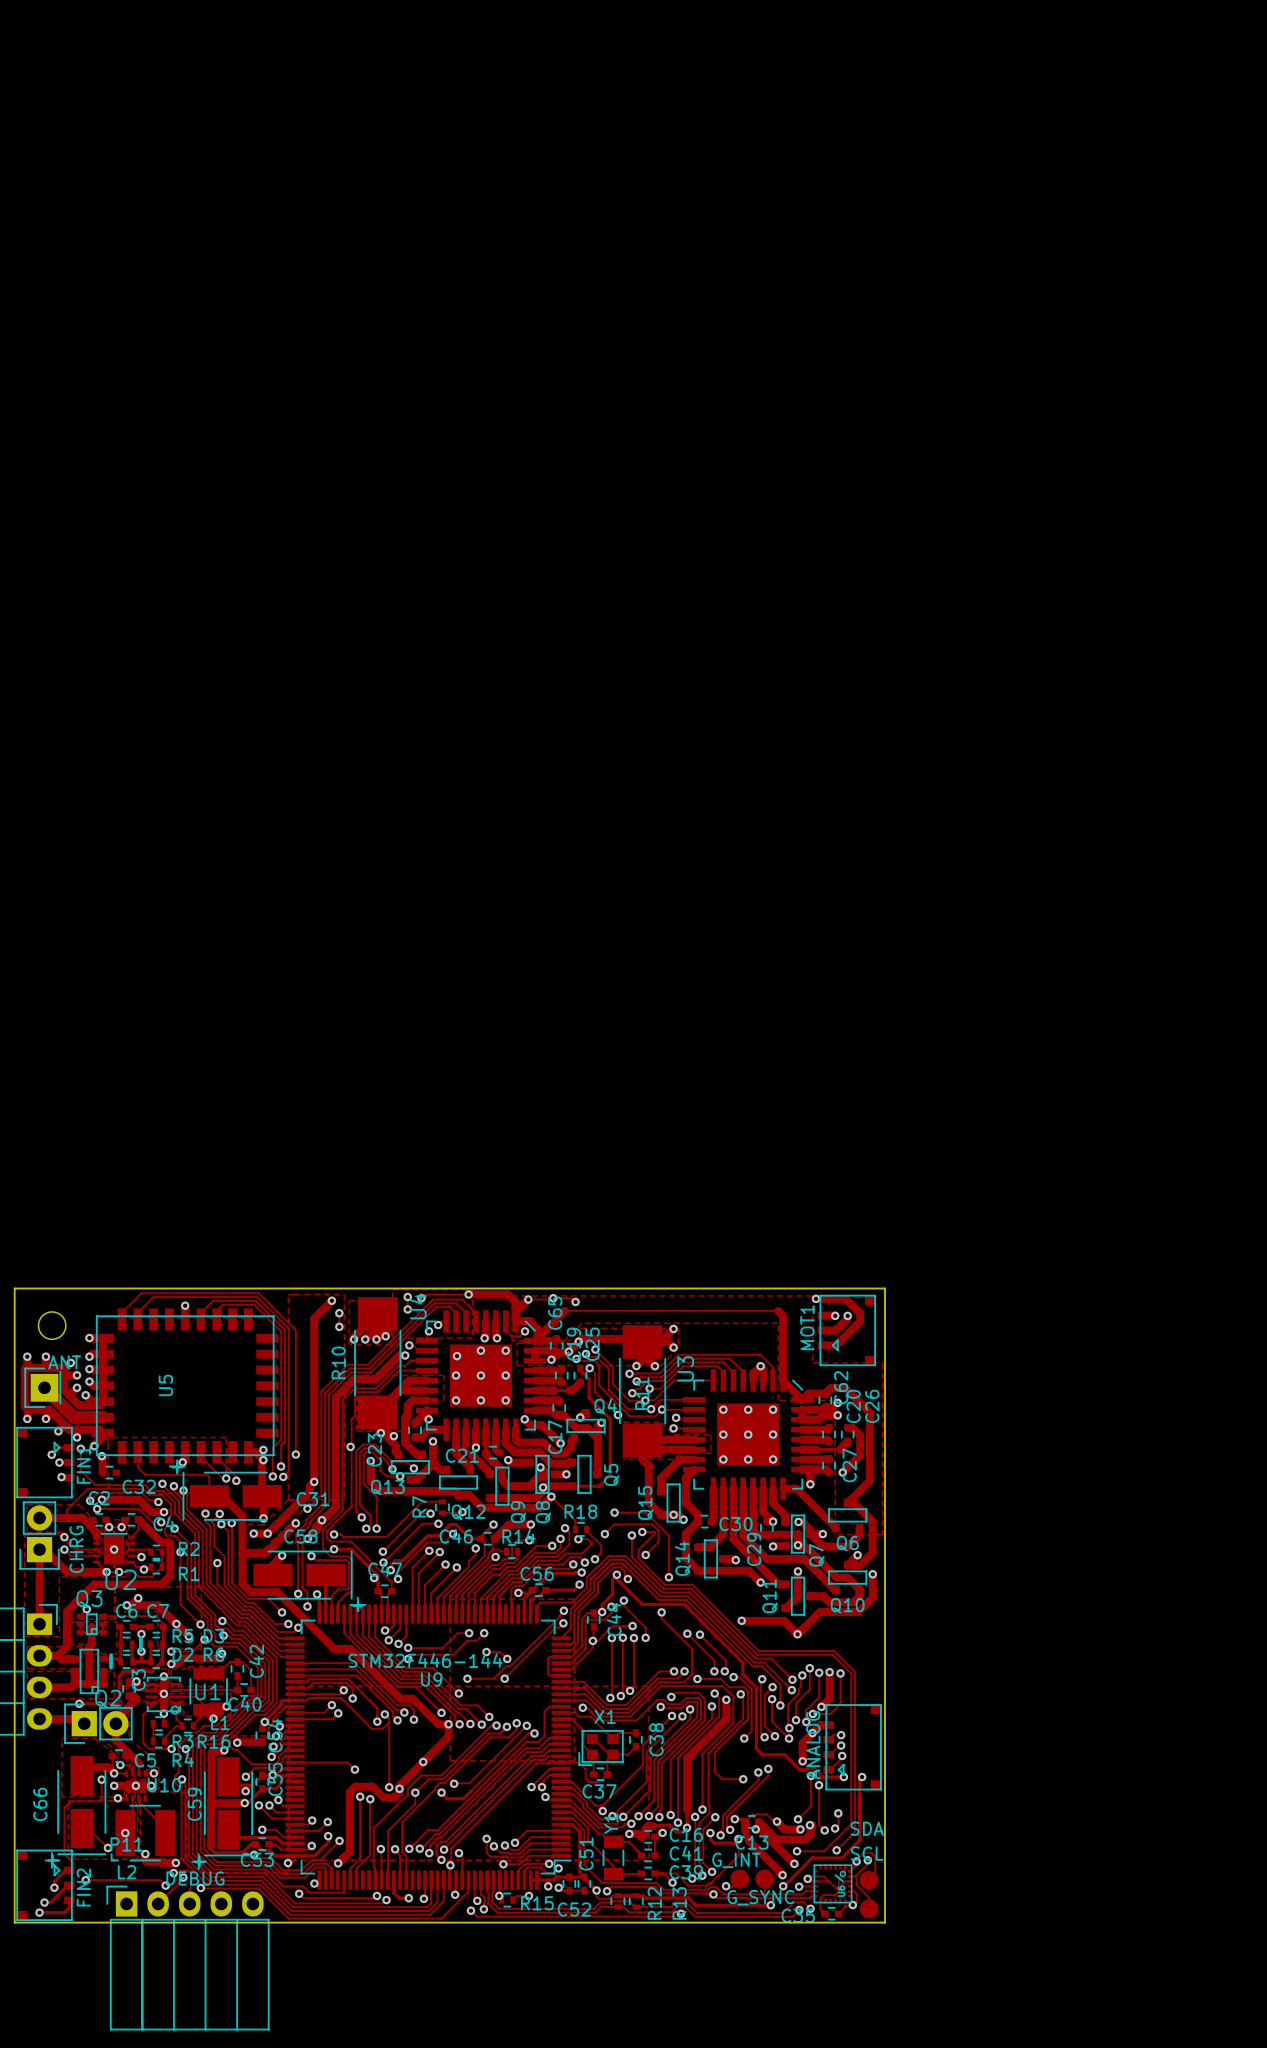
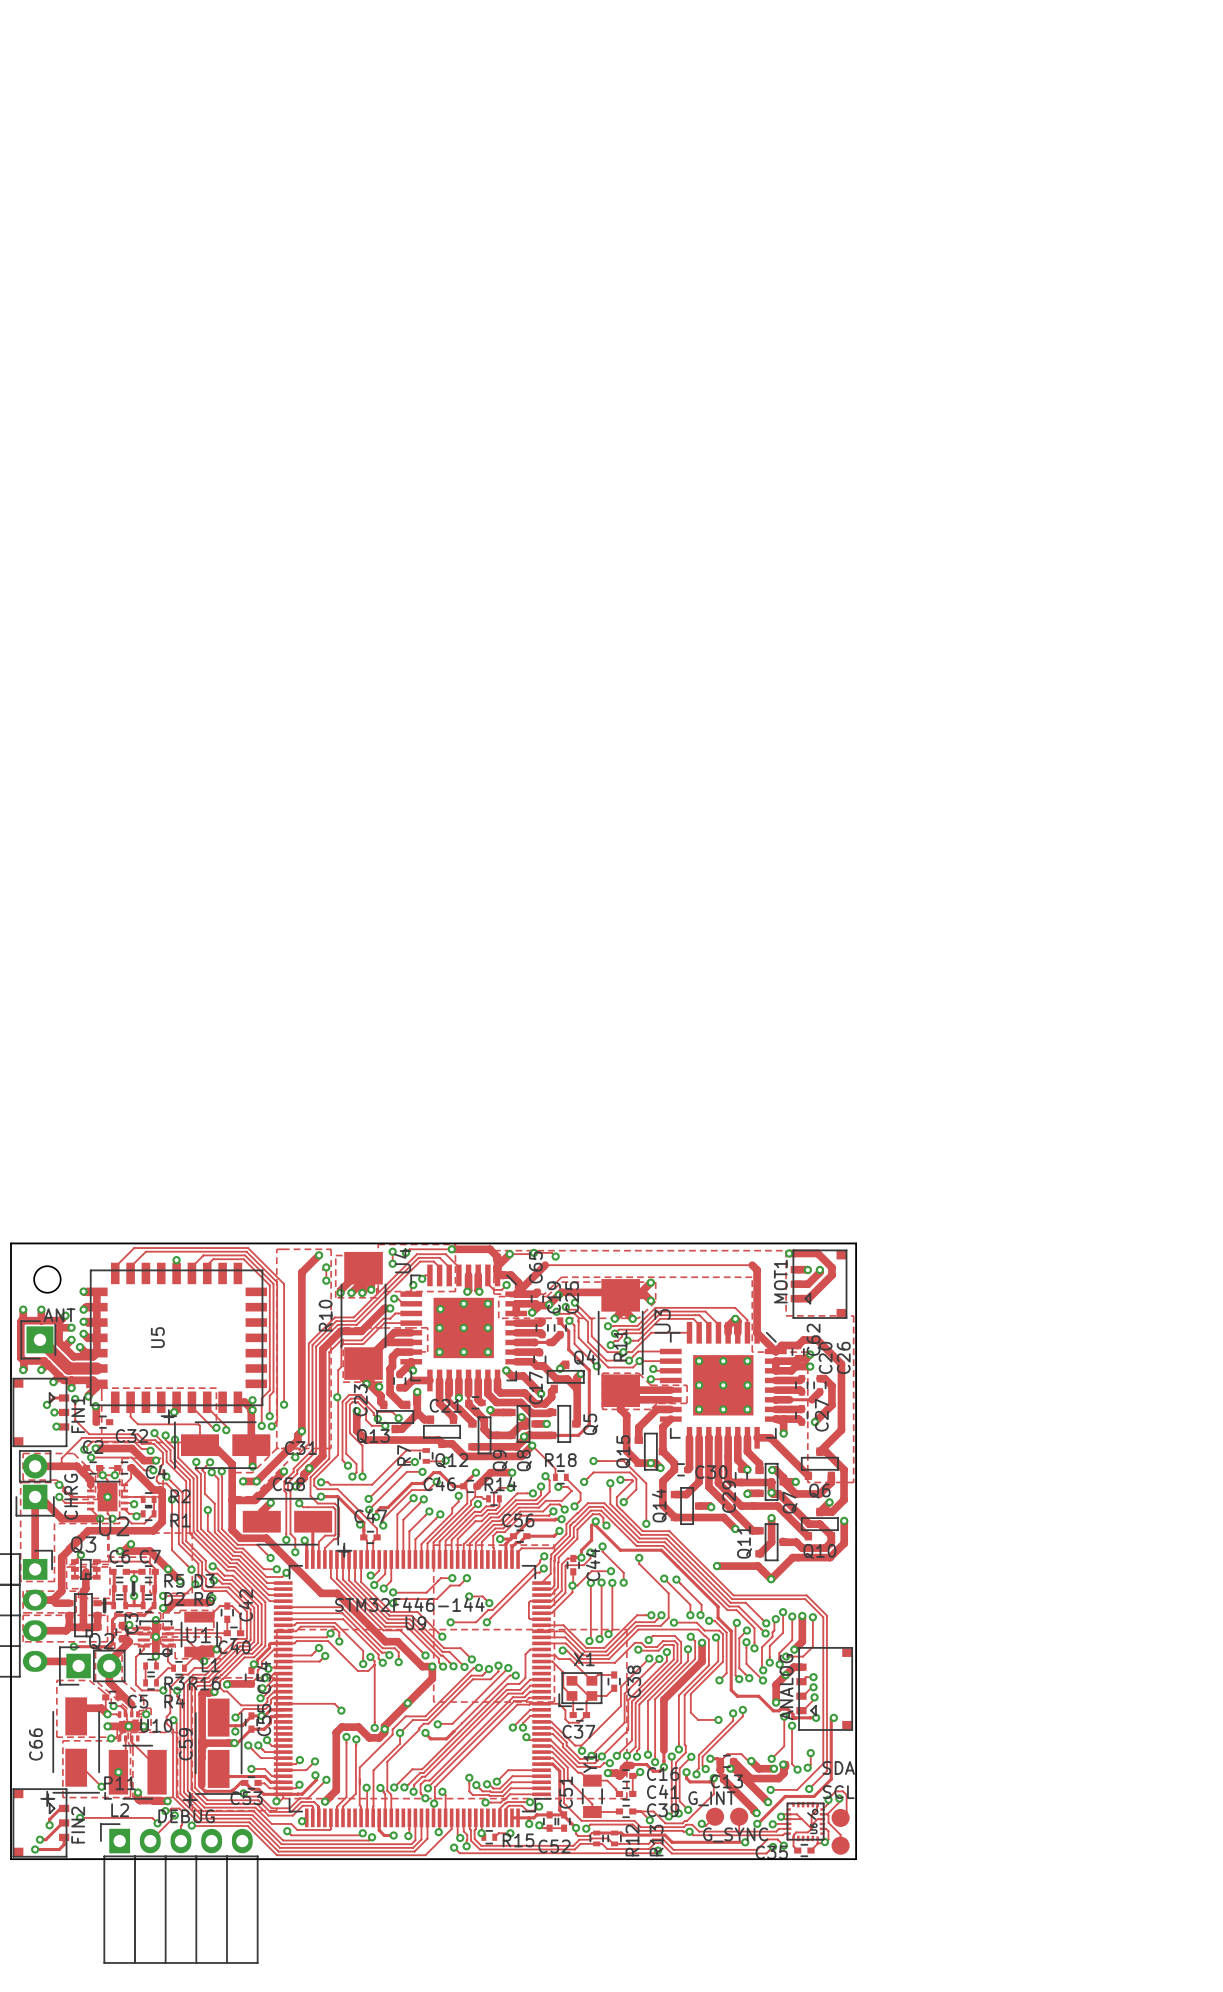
track: (101, 1779) (101, 1798) (98, 1801) (70, 1801) (64, 1807) (64, 1854) (73, 1863) -> none
via: (101, 1779) -> none

